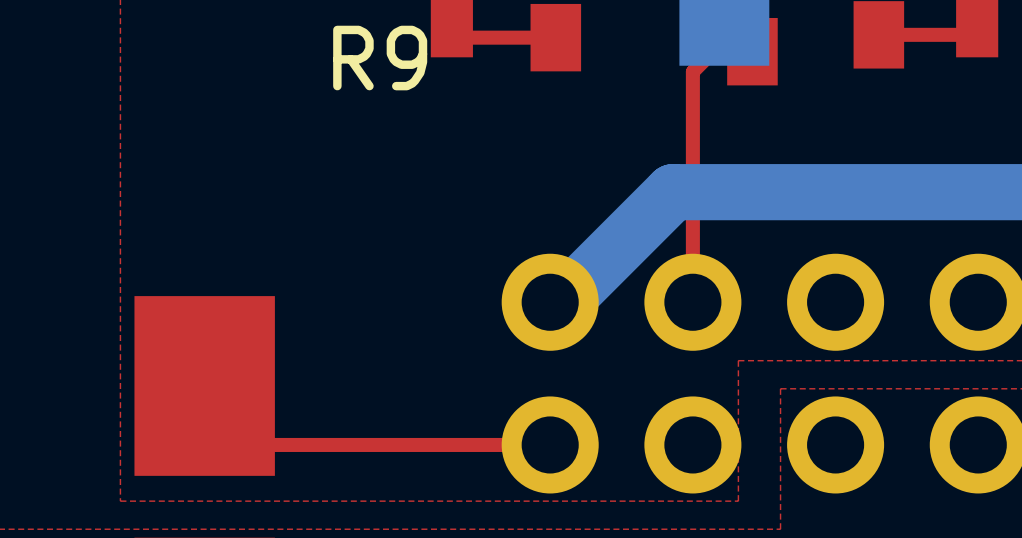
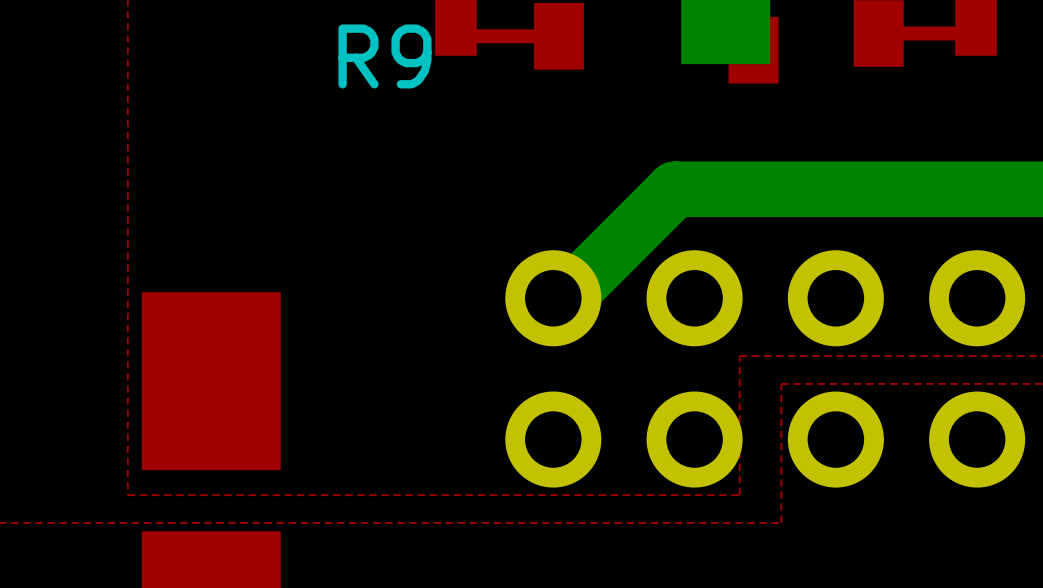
top track: (752, 51) (713, 51) (692, 71) (692, 302) -> none
top track: (204, 385) (263, 444) (550, 444) -> none

